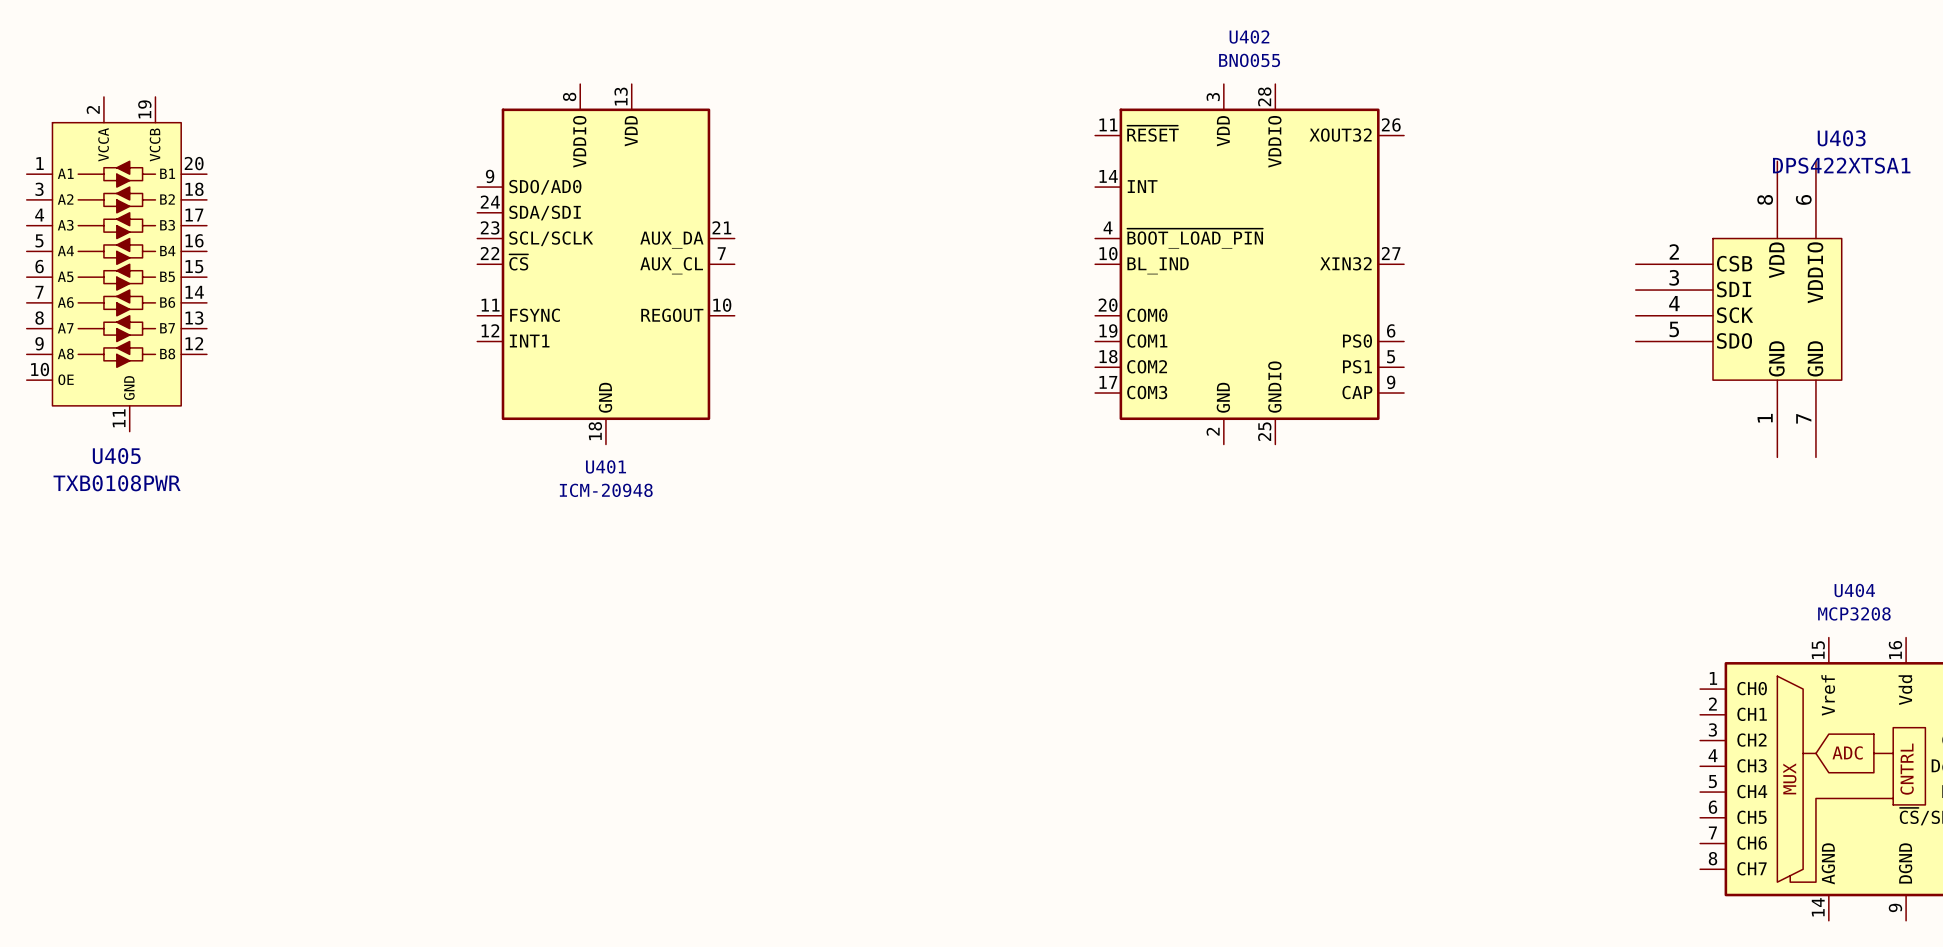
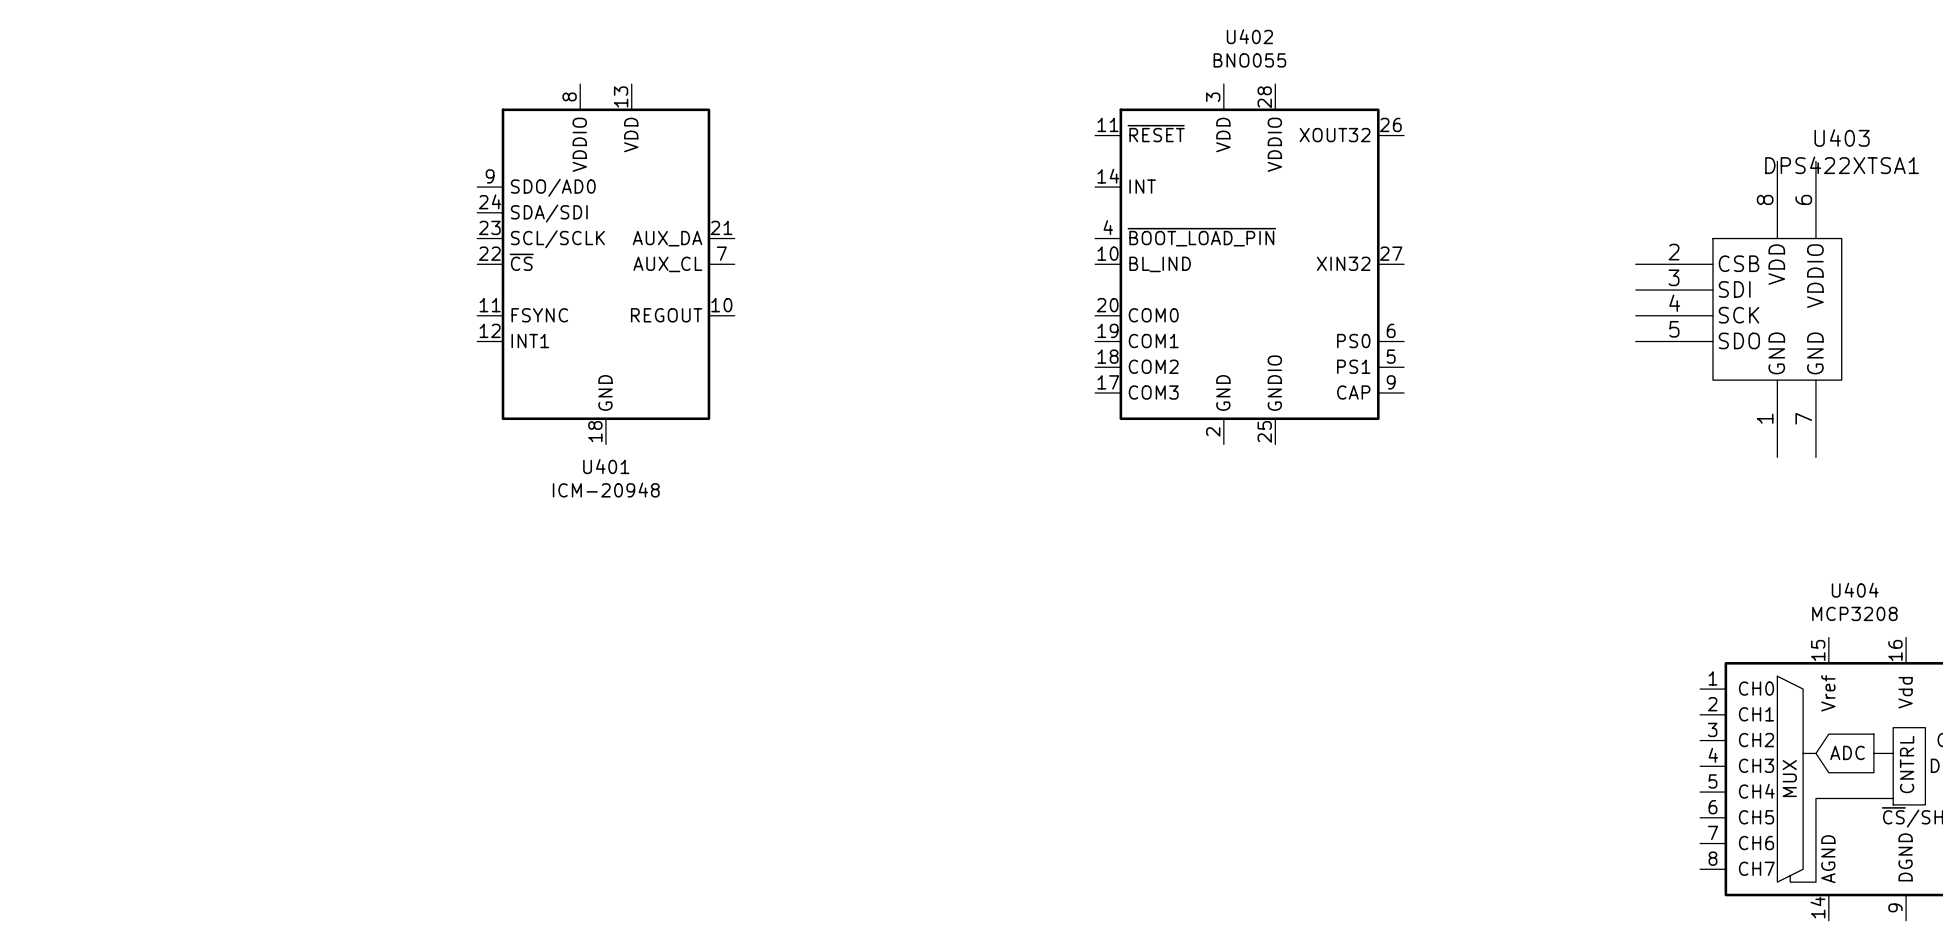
U405: TXB0108PWR (116, 264) -> none

